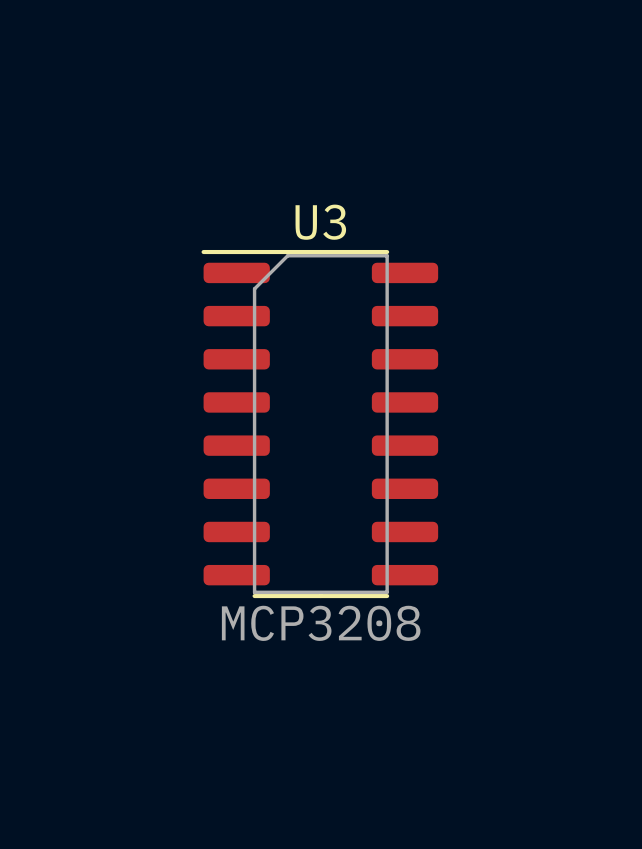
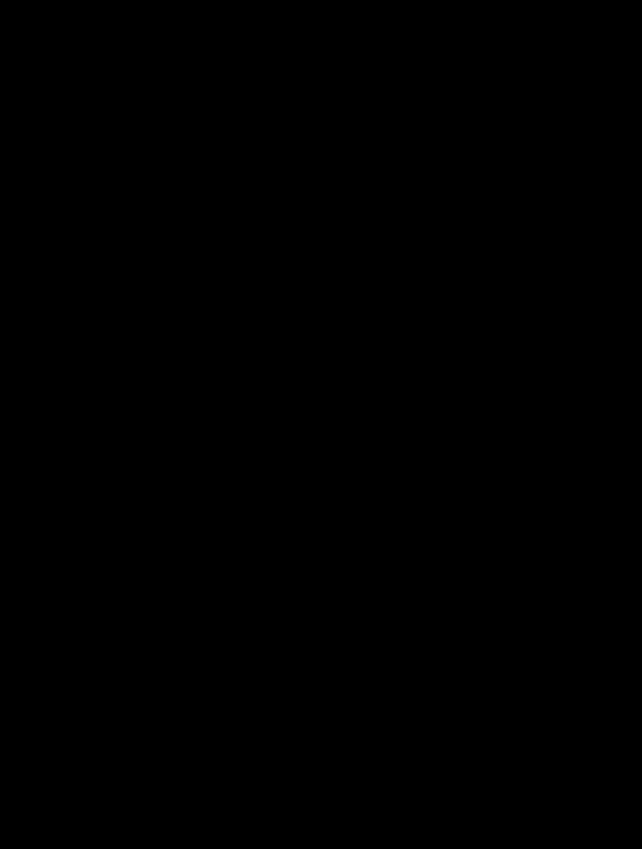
U3: MCP3208 (319, 424) -> none

